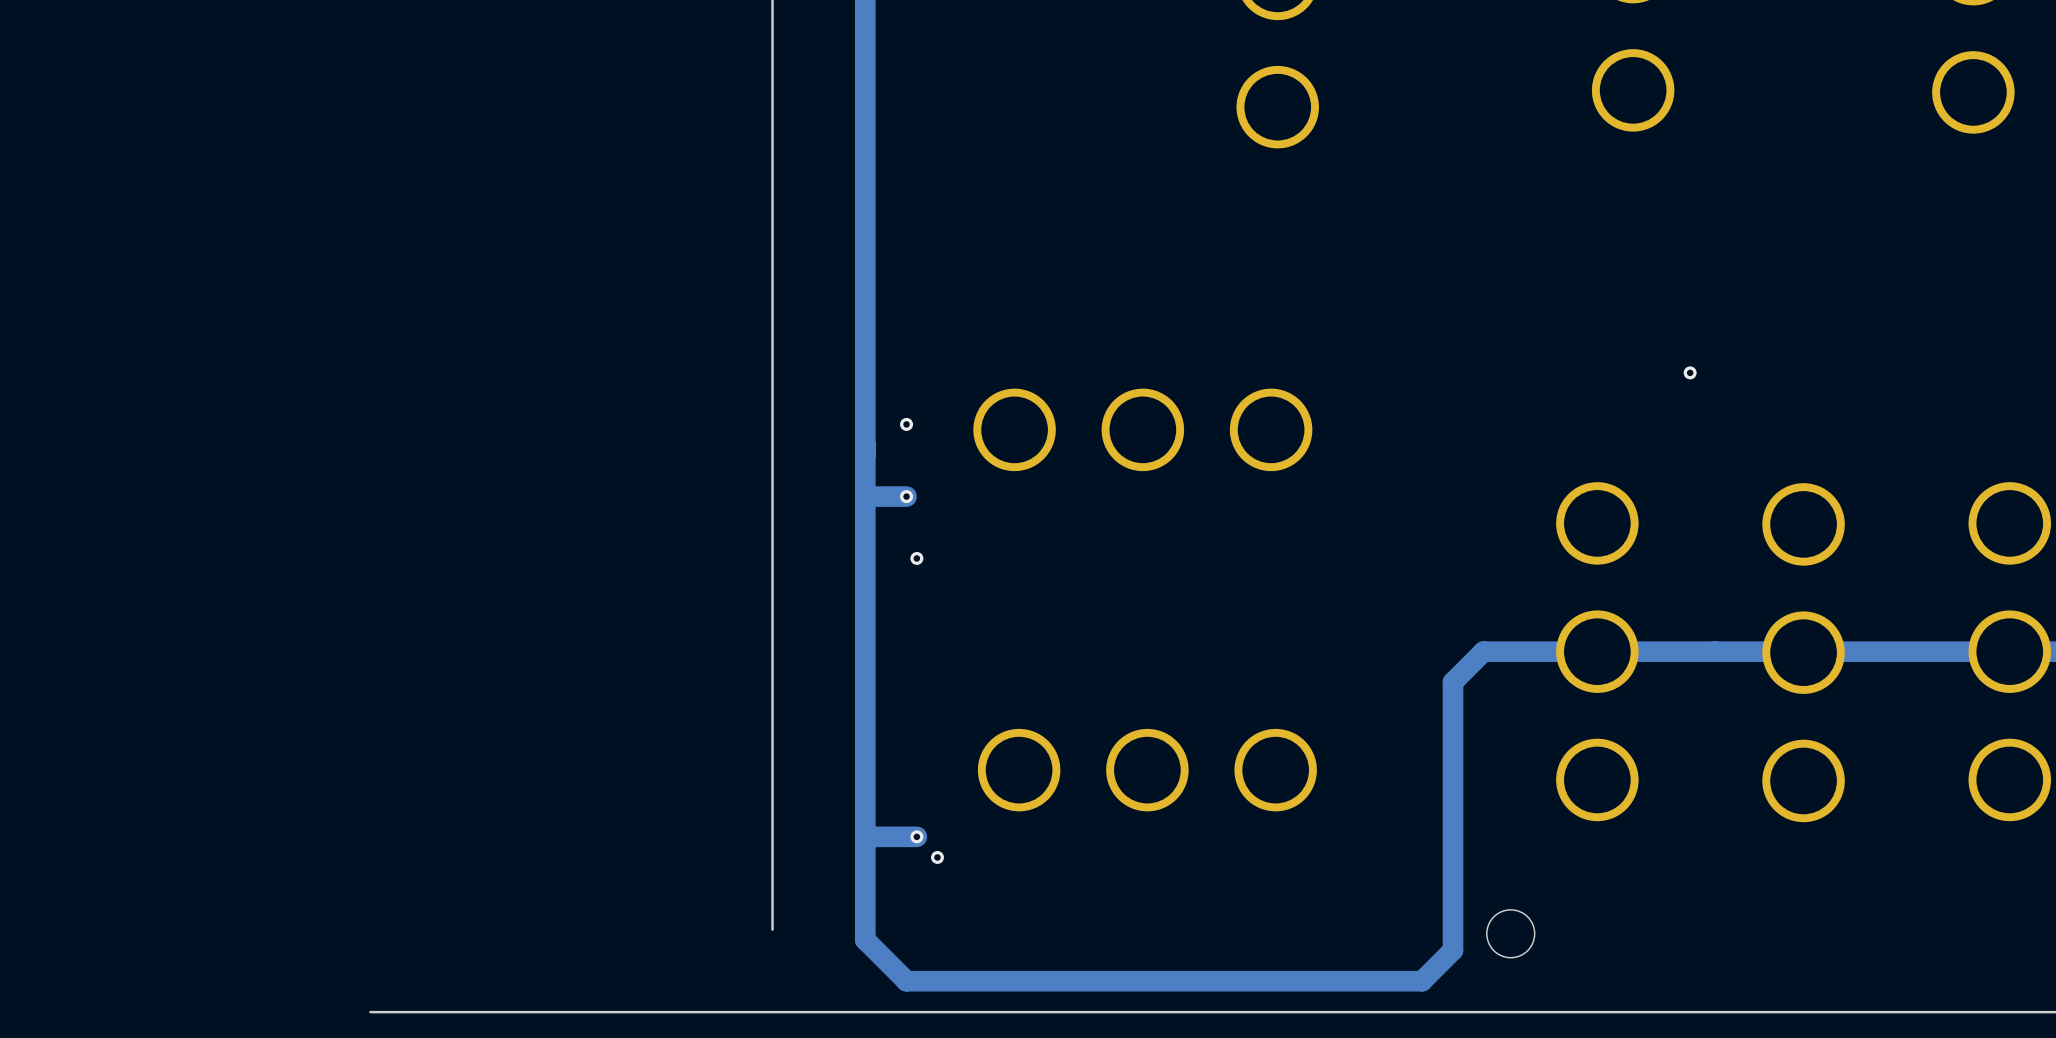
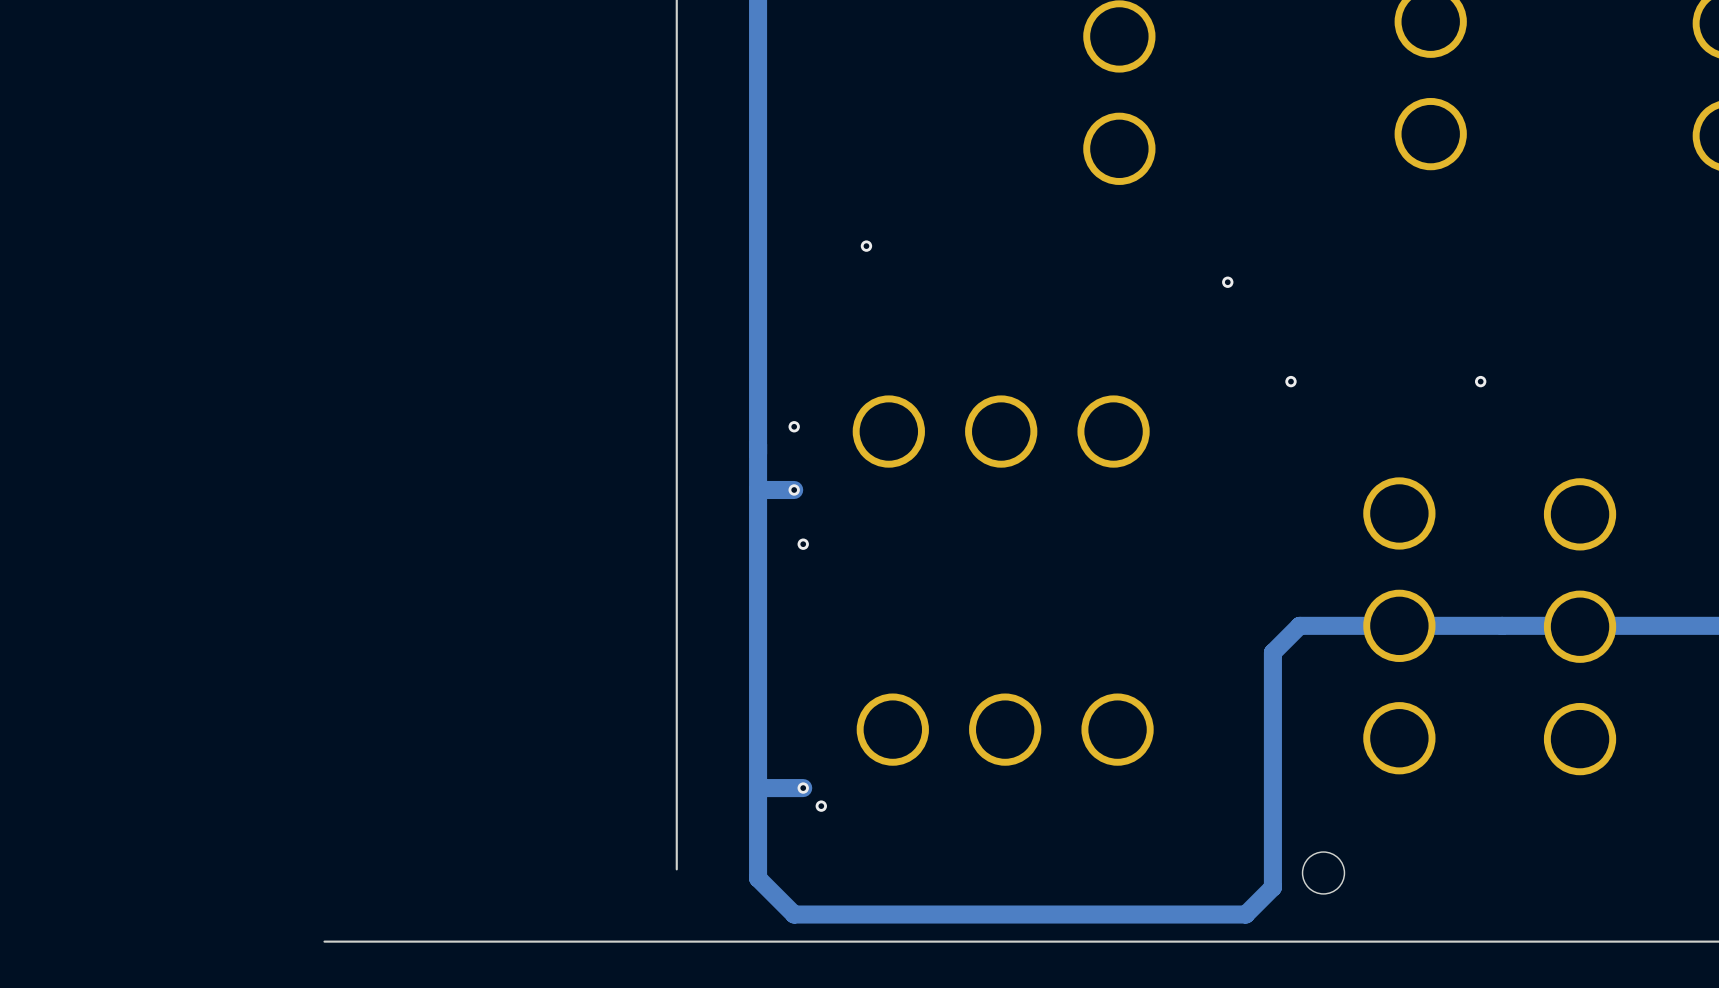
via: none -> (866, 246)
via: none -> (1227, 282)
via: none -> (1290, 381)

